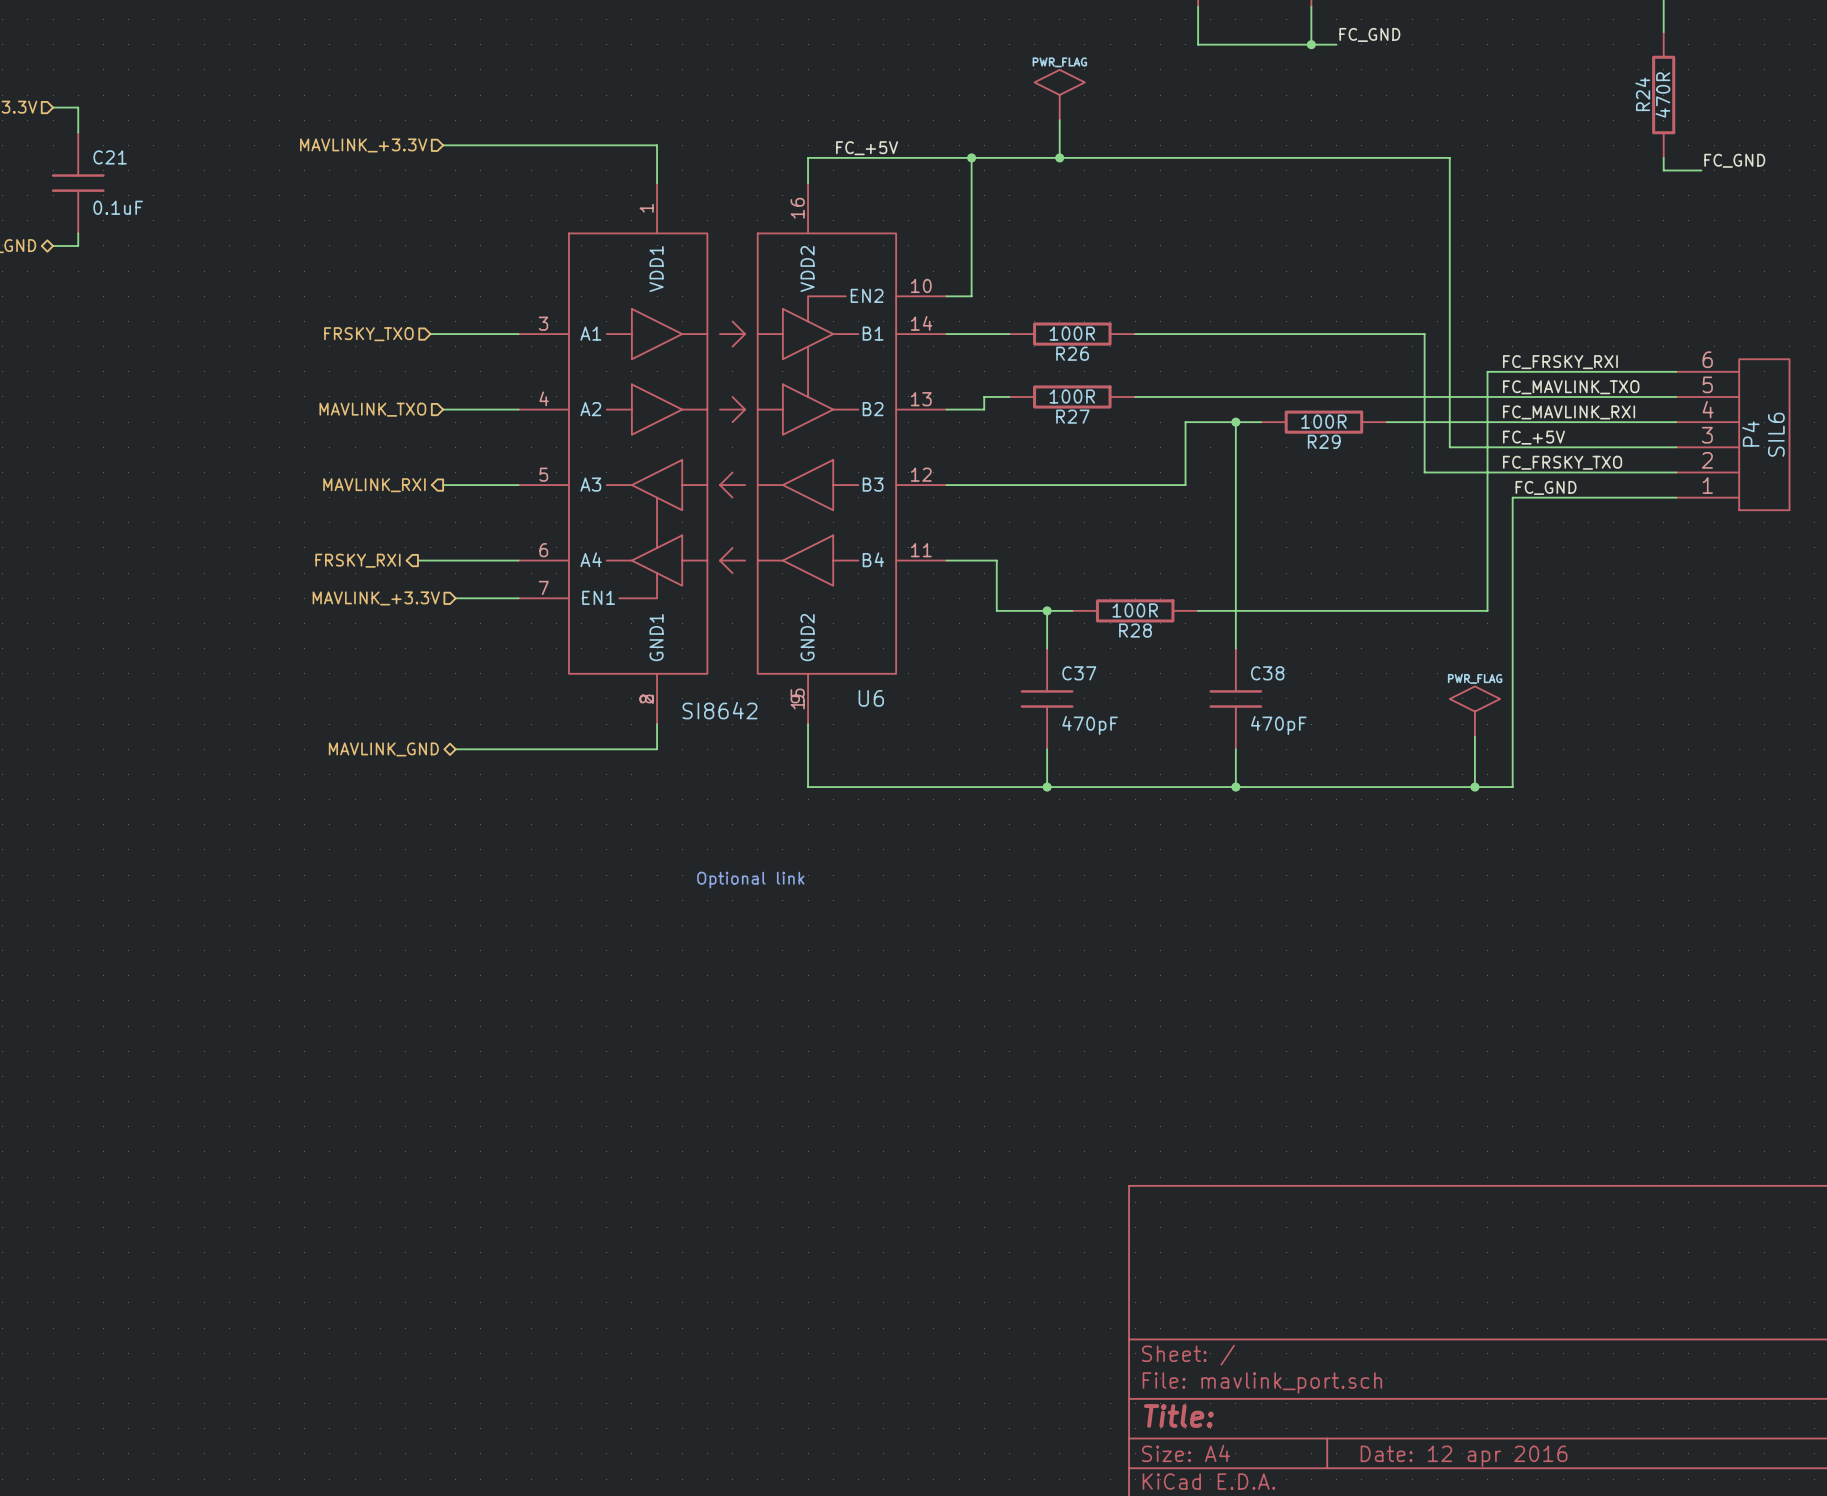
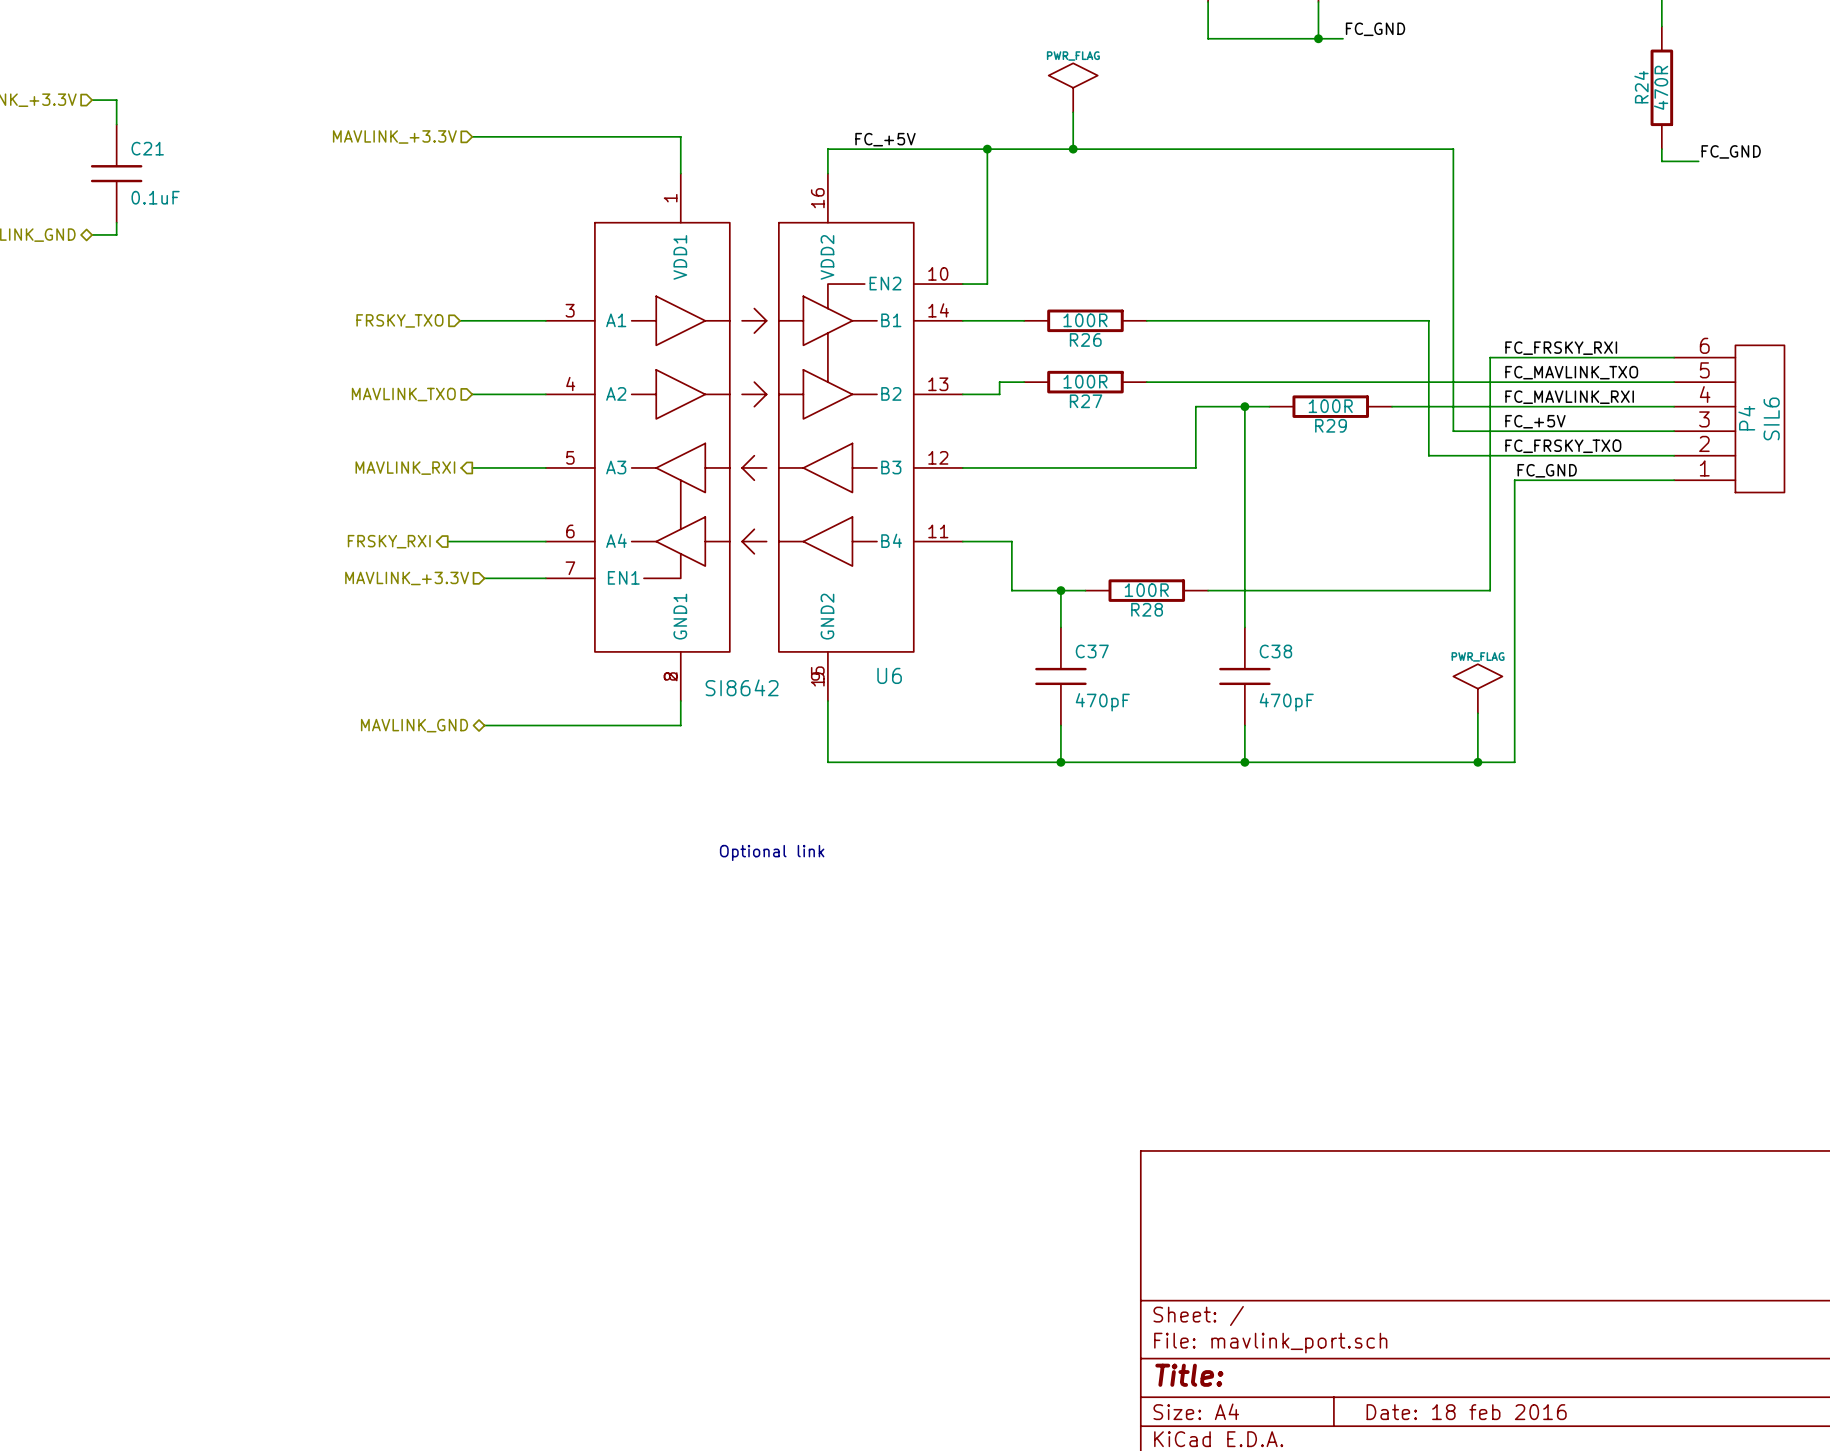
title block: Date: 12 apr 2016 (1464, 1456) -> Date: 18 feb 2016 (1466, 1412)

